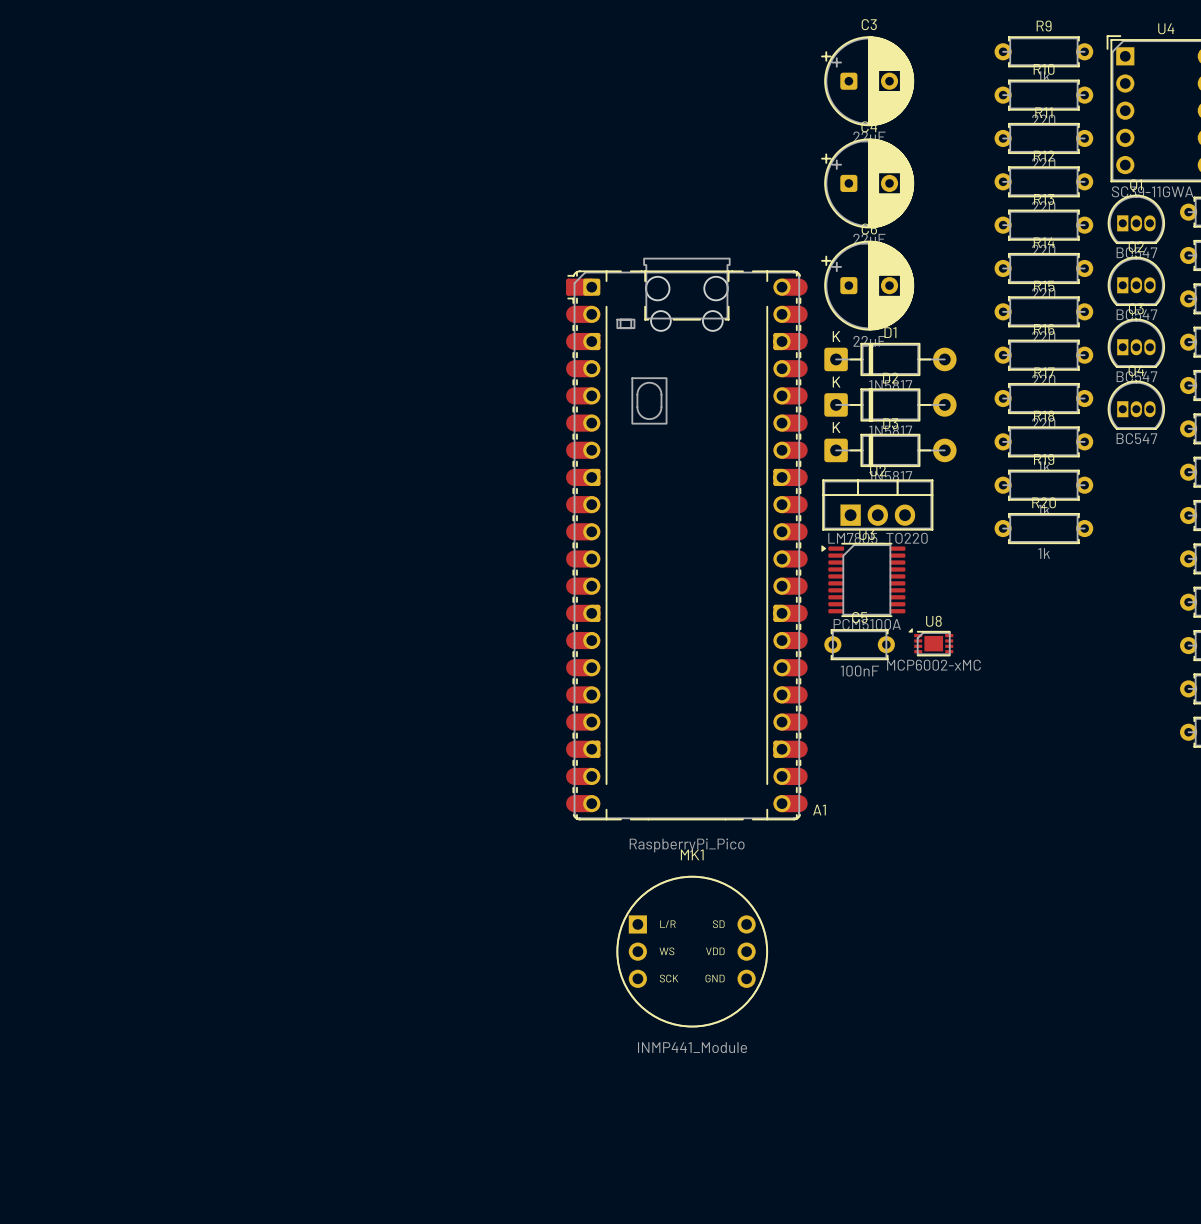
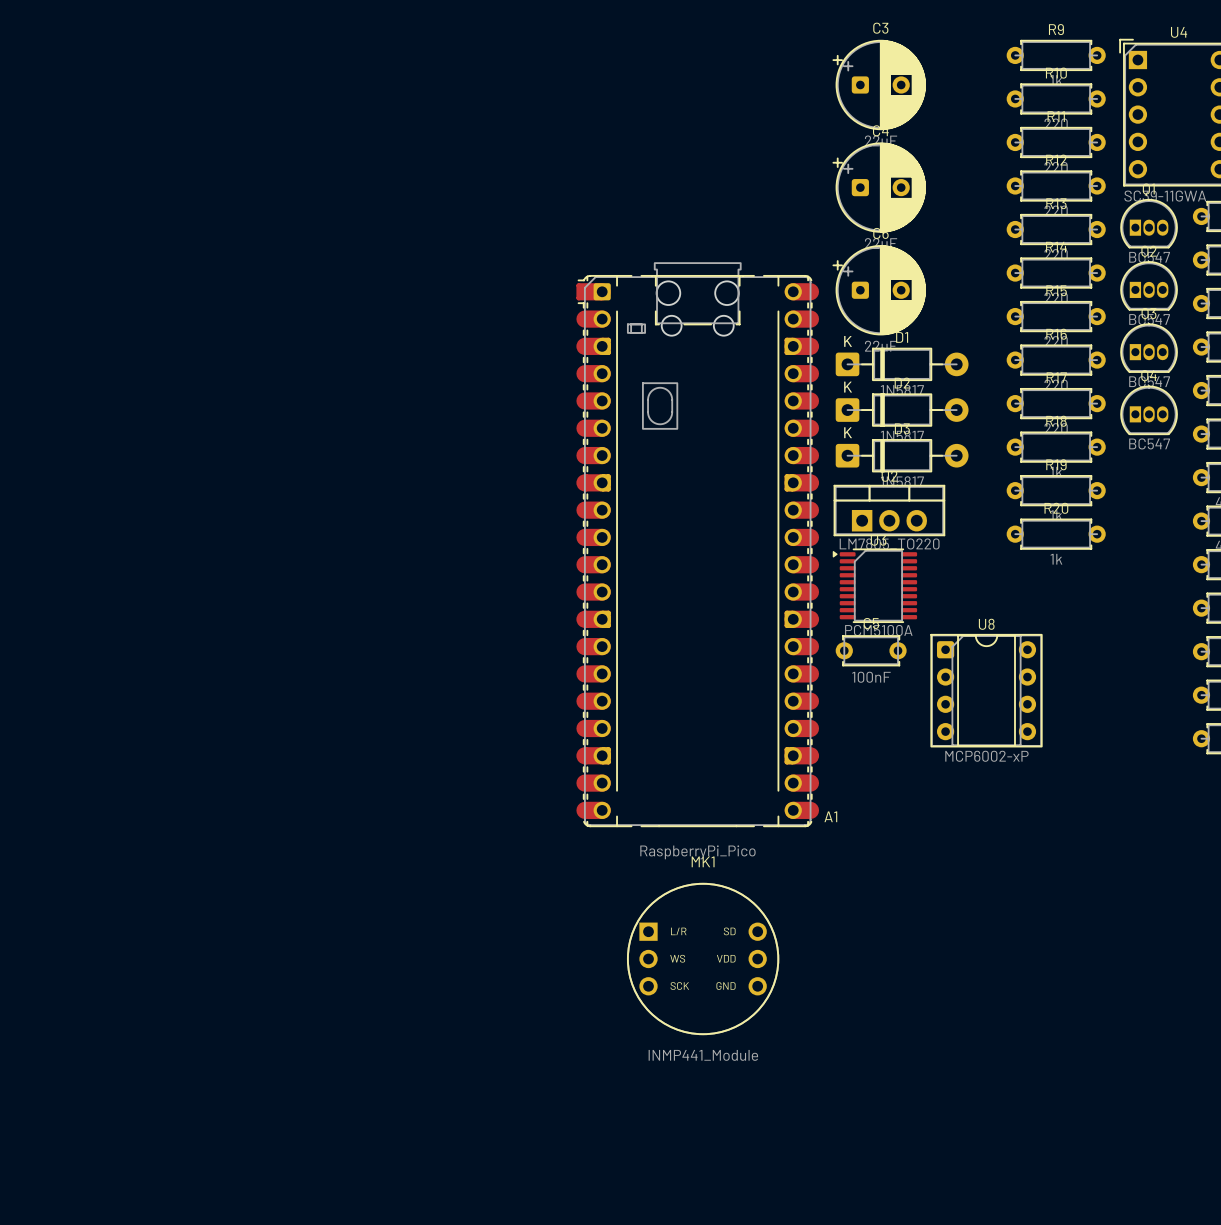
U8 name position: U8 (933, 621) -> U8 (986, 624)
U8 footprint: [908, 628, 954, 657] -> [930, 634, 1043, 748]
U8 value: MCP6002-xMC (933, 665) -> MCP6002-xP (986, 756)

